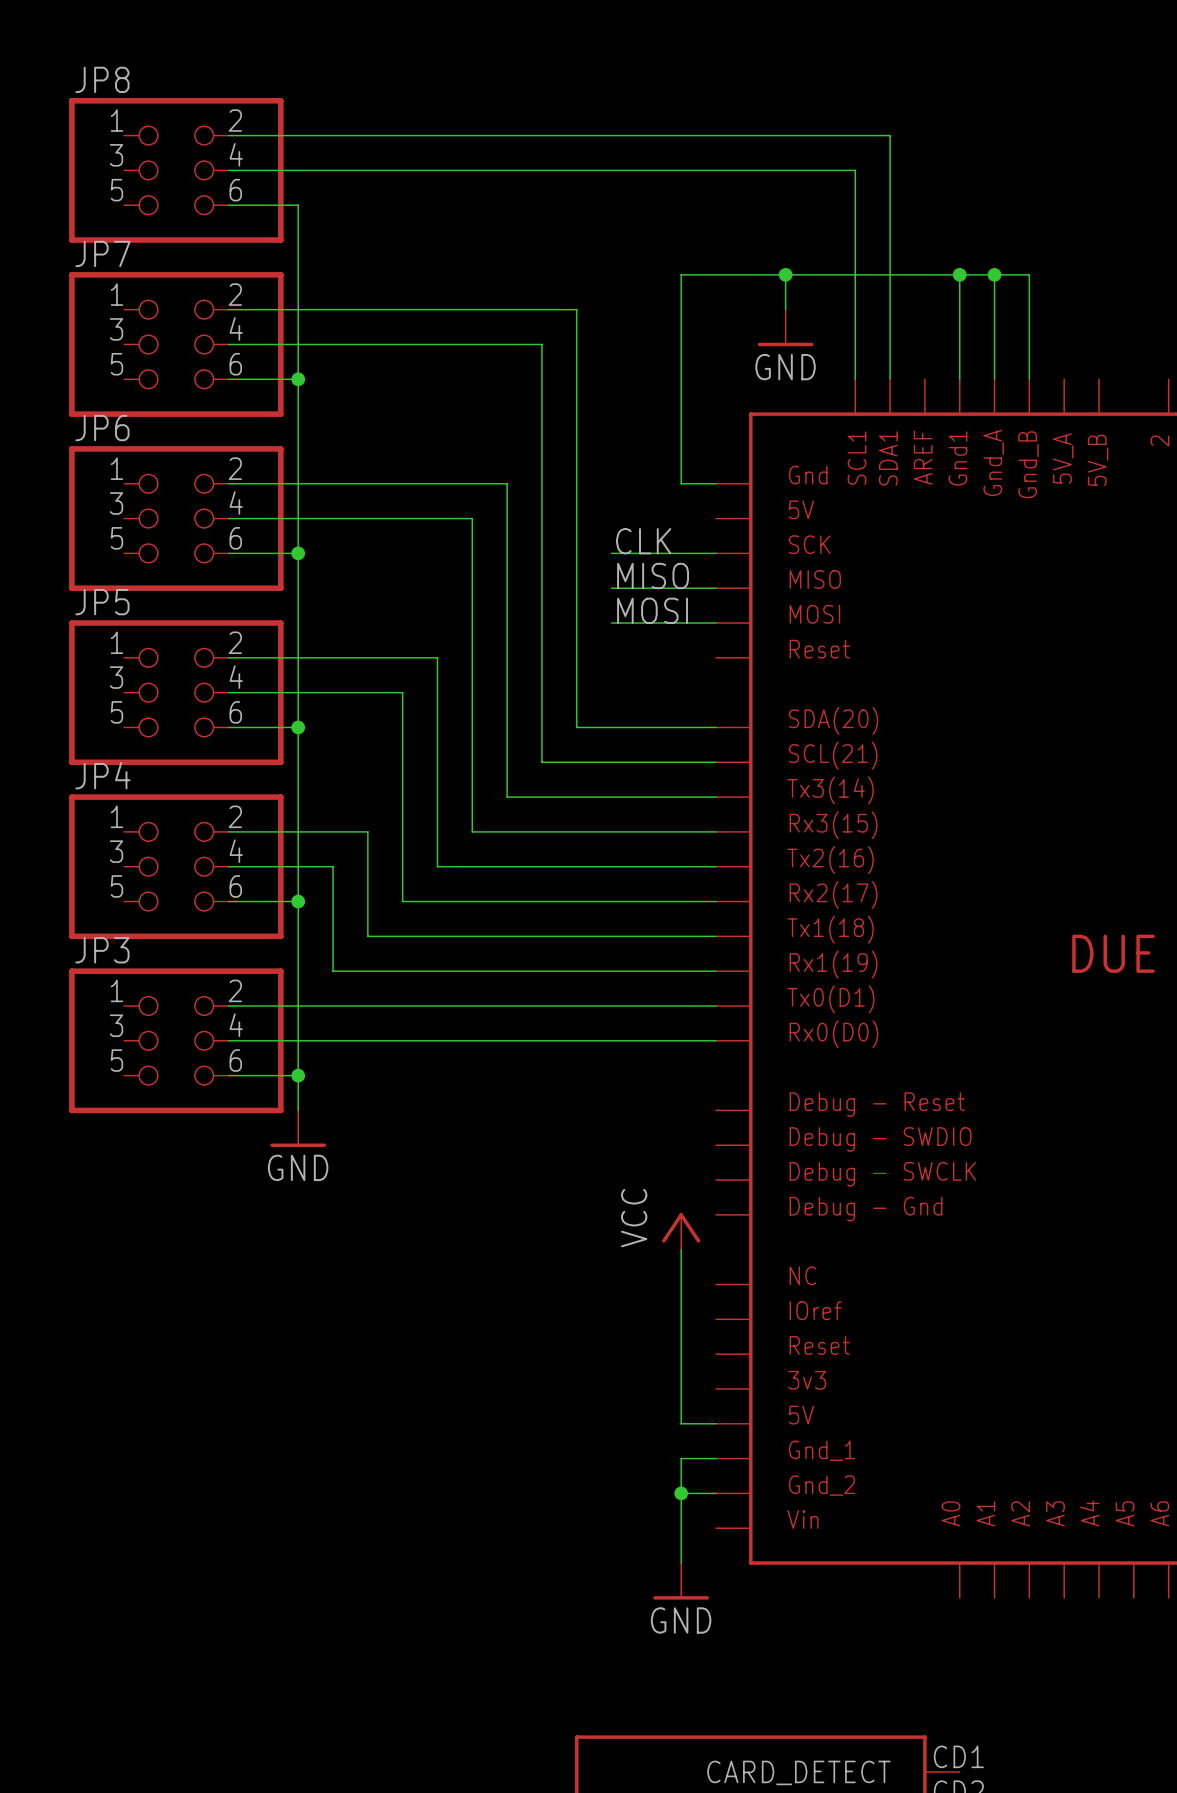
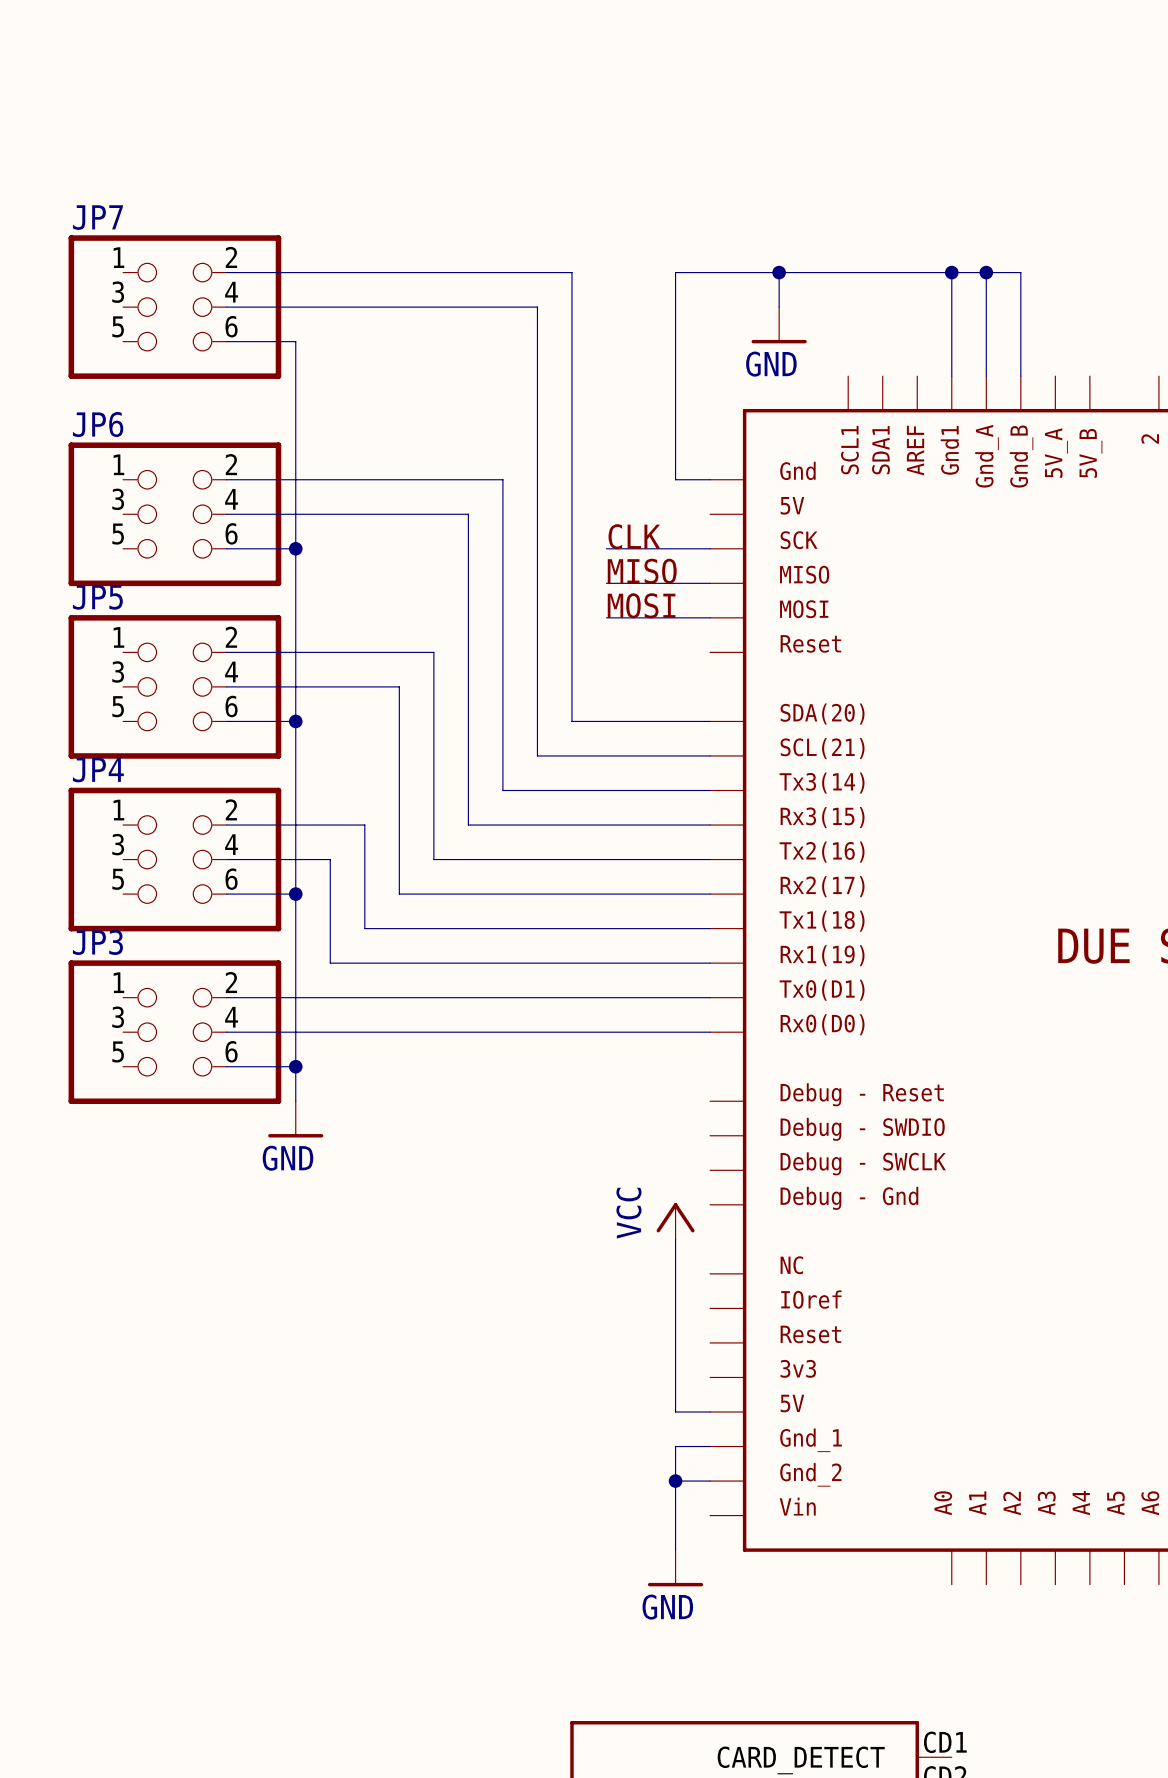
wire: (228, 135) (890, 135) (890, 379) -> none
JP8: (176, 170) -> none
wire: (228, 170) (855, 170) (855, 379) -> none
wire: (228, 205) (298, 205) (298, 344) (541, 344) -> none
wire: none -> (226, 272) (571, 272) (571, 307)
wire: (541, 309) (576, 309) -> (537, 307) (537, 341)
JP7 position: (176, 344) -> (174, 307)
junction: (298, 379) -> none

